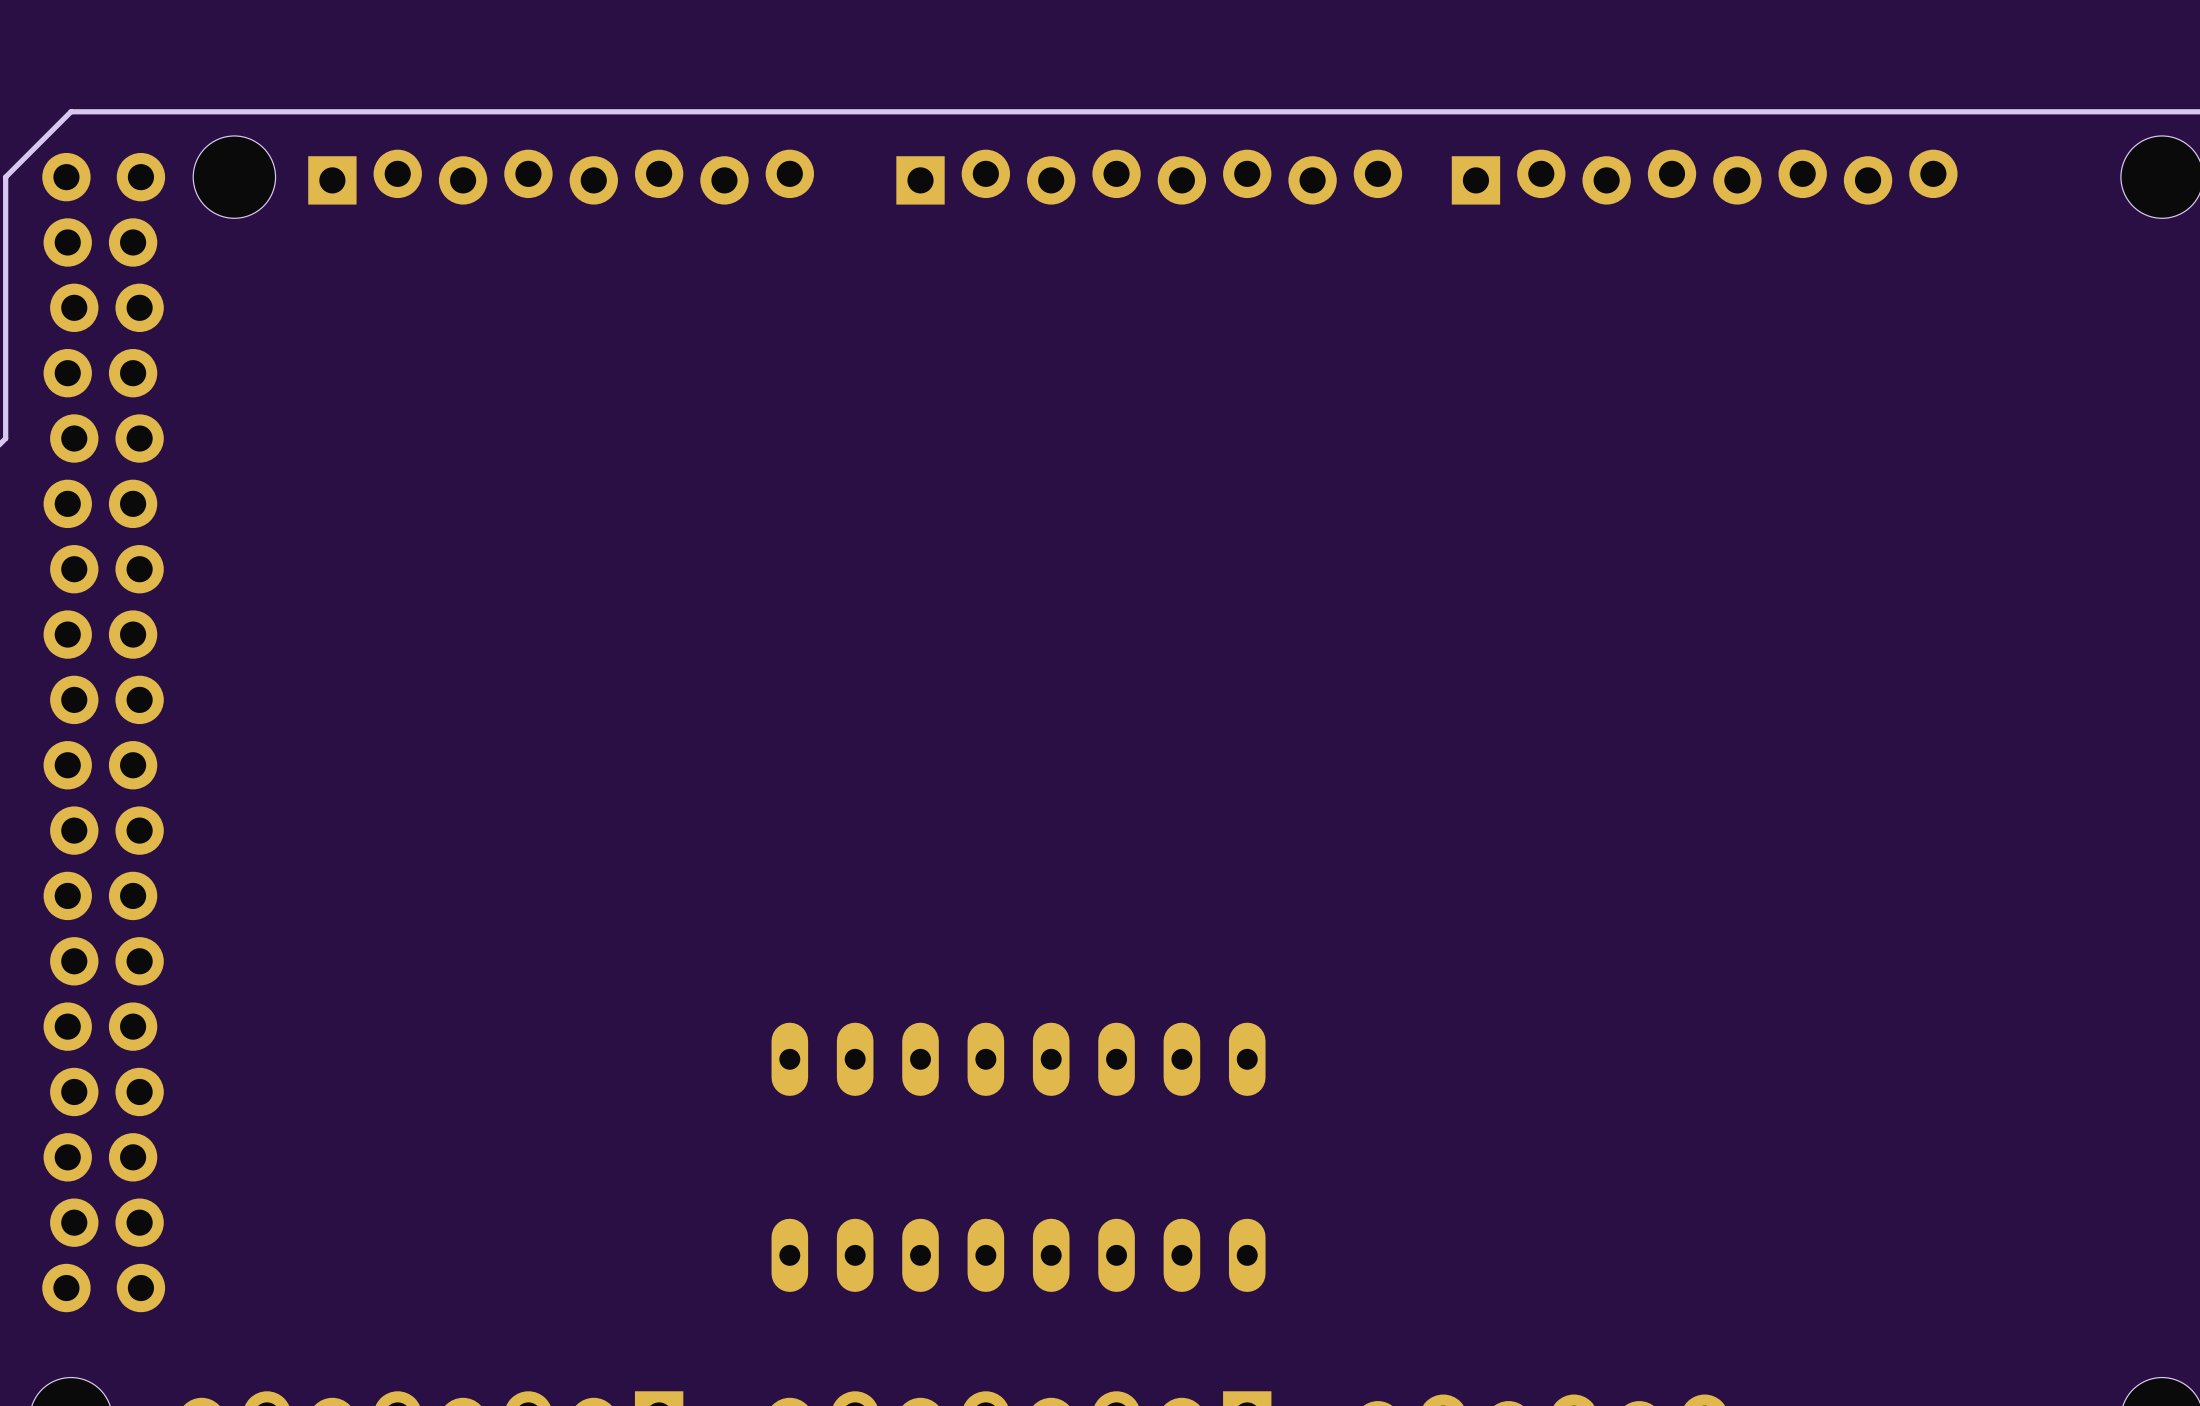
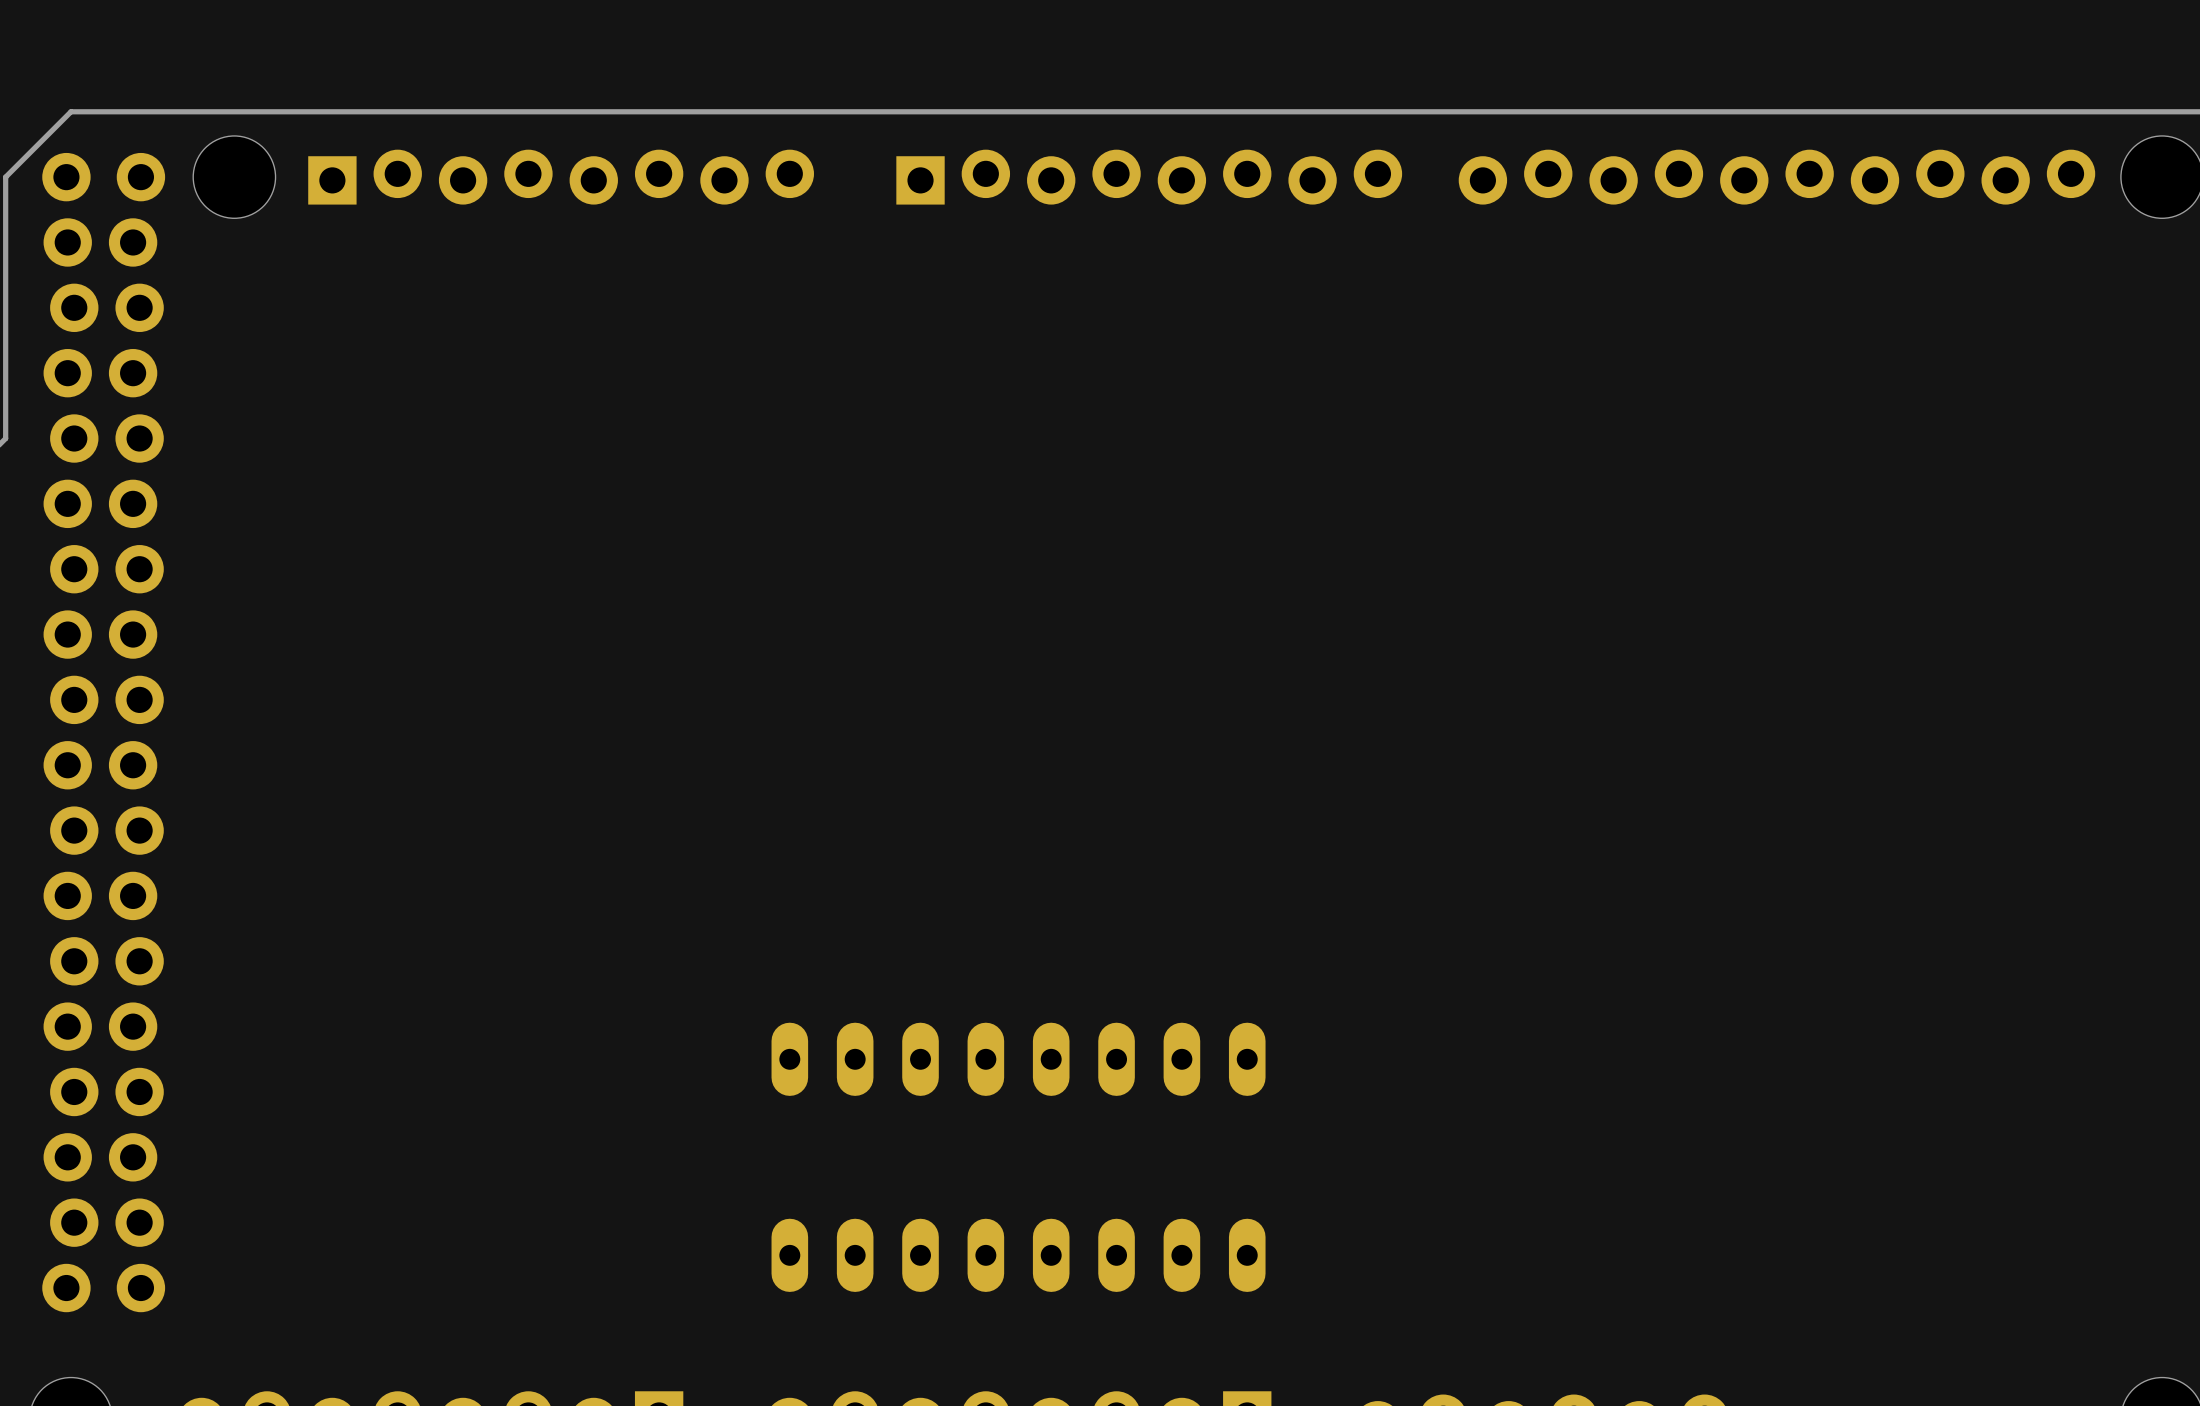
part: (1704, 177) -> none
part: none -> (1776, 177)

